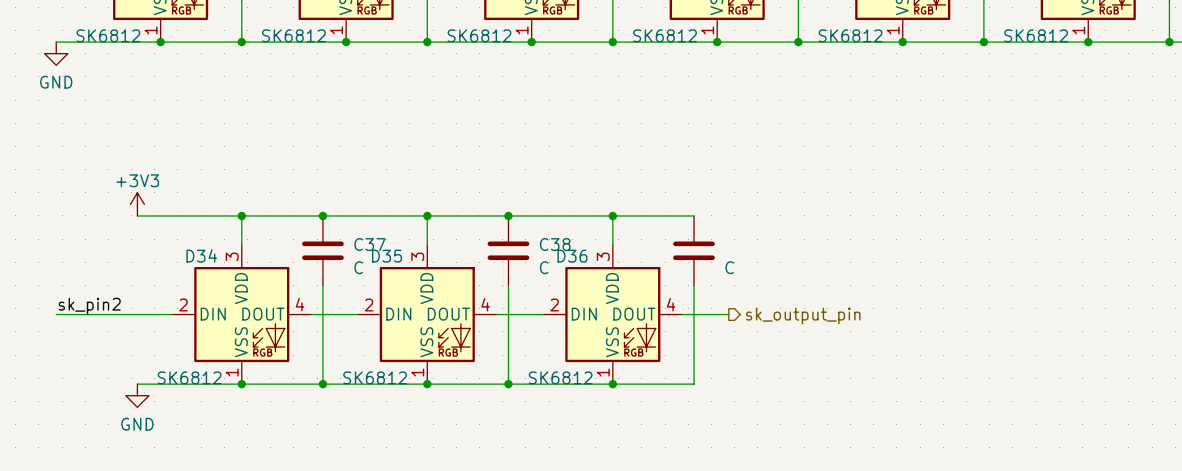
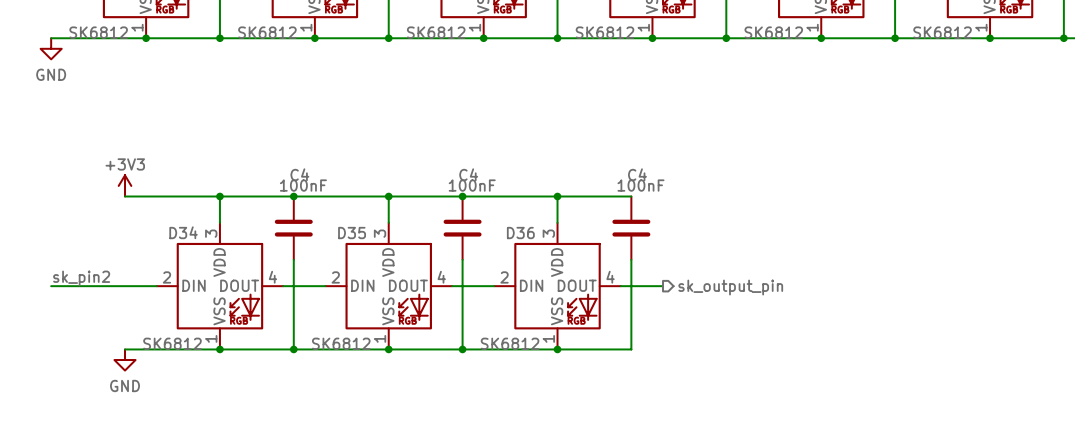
C4 name: none -> C4 (637, 174)
C37 name: C37 (369, 244) -> C4 (299, 174)
C38 name: C38 (555, 244) -> C4 (468, 174)
C37 value: C (358, 267) -> 100nF (303, 185)
C38 value: C (544, 267) -> 100nF (472, 185)
C4 value: C (729, 267) -> 100nF (640, 185)

